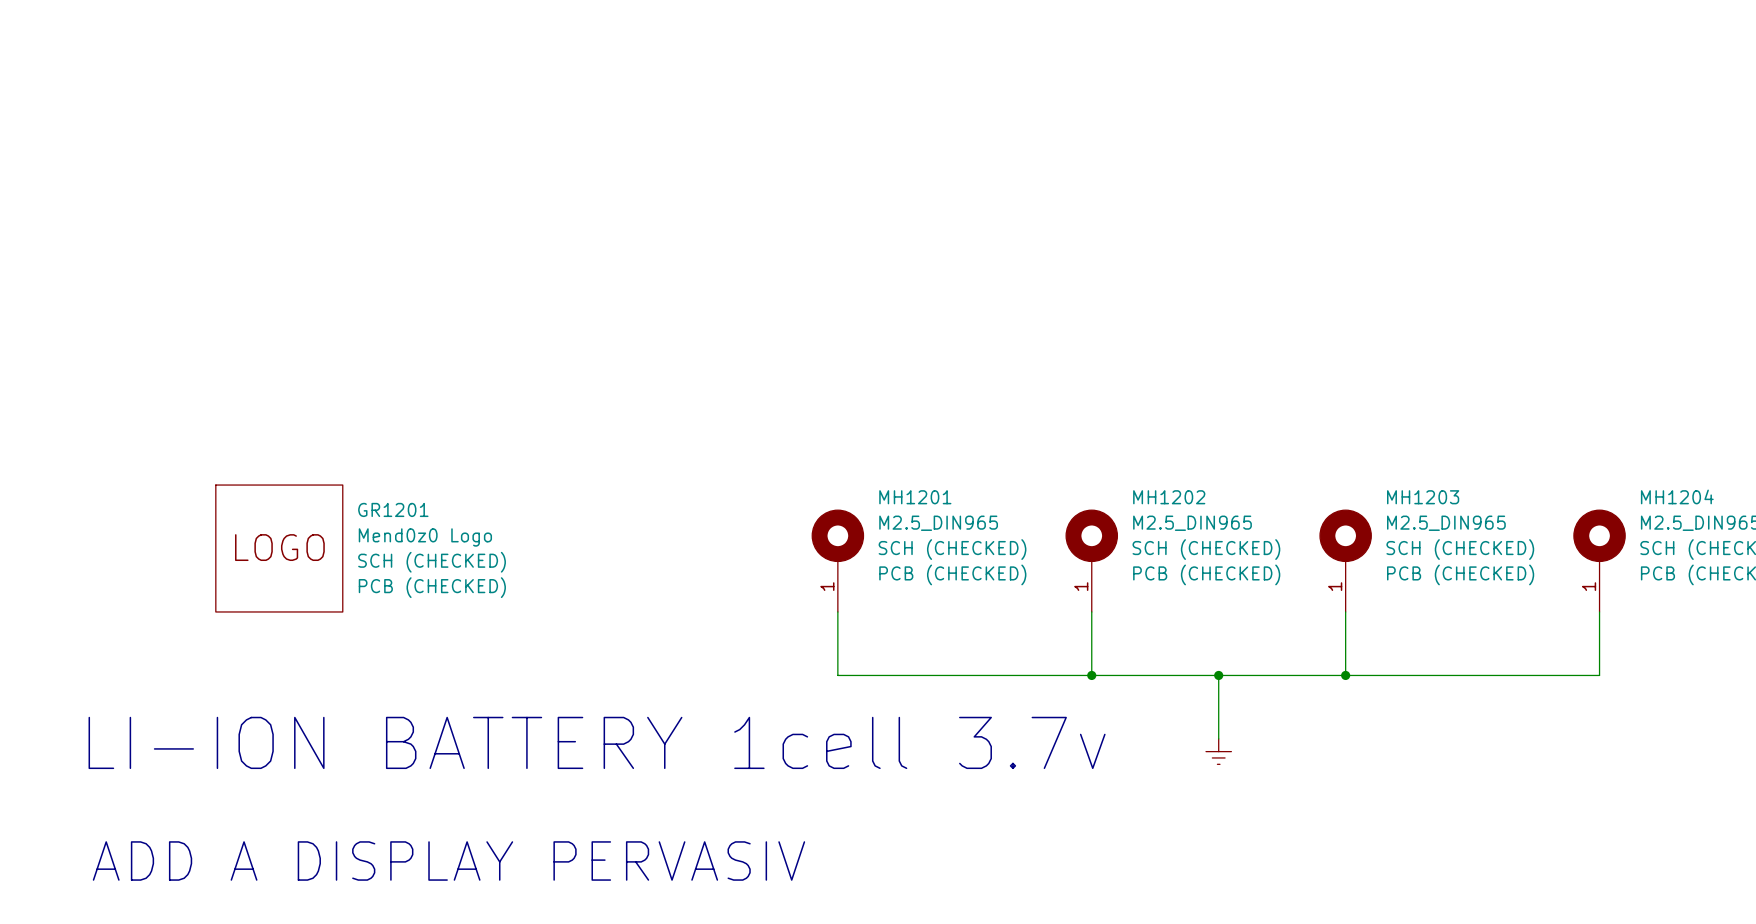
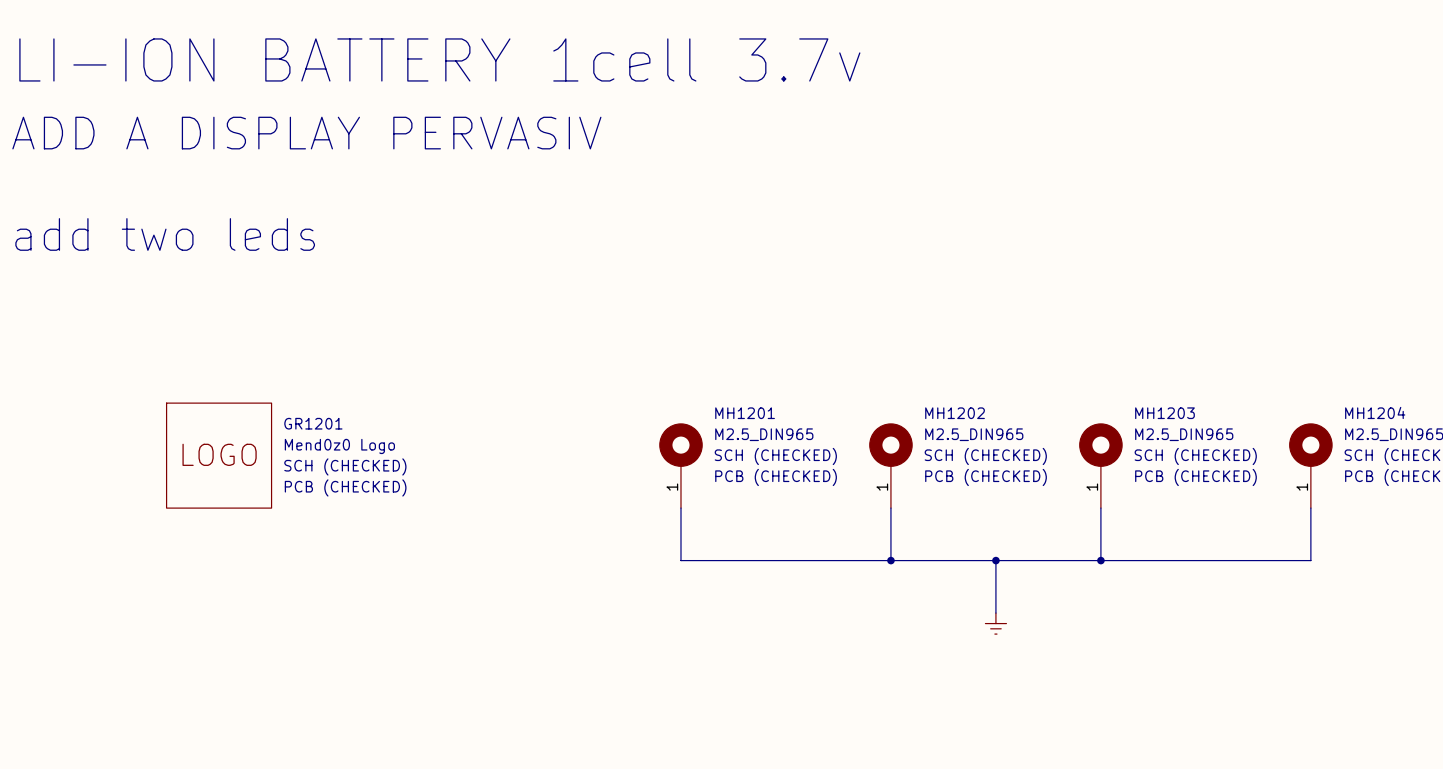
text: none -> LI-ION BATTERY 1cell 3.7v (439, 59)
text: none -> ADD A DISPLAY PERVASIV (306, 133)
text: none -> add two leds (165, 234)
text: LI-ION BATTERY 1cell 3.7v (597, 742) -> none
text: ADD A DISPLAY PERVASIV (448, 861) -> none

